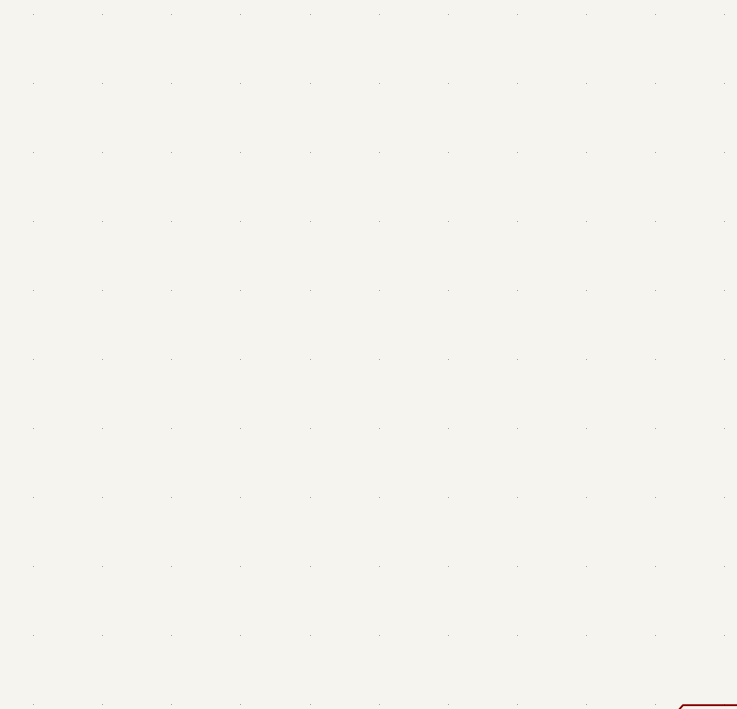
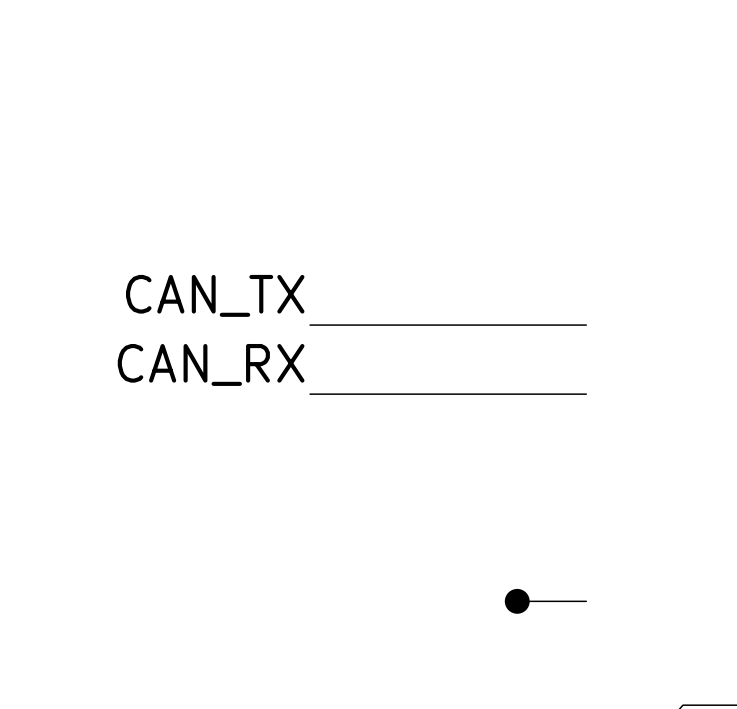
label: none -> CAN_TX (215, 295)
wire: none -> (310, 325) (586, 325)
label: none -> CAN_RX (211, 364)
wire: none -> (310, 394) (586, 394)
wire: none -> (517, 601) (586, 601)
junction: none -> (517, 601)

